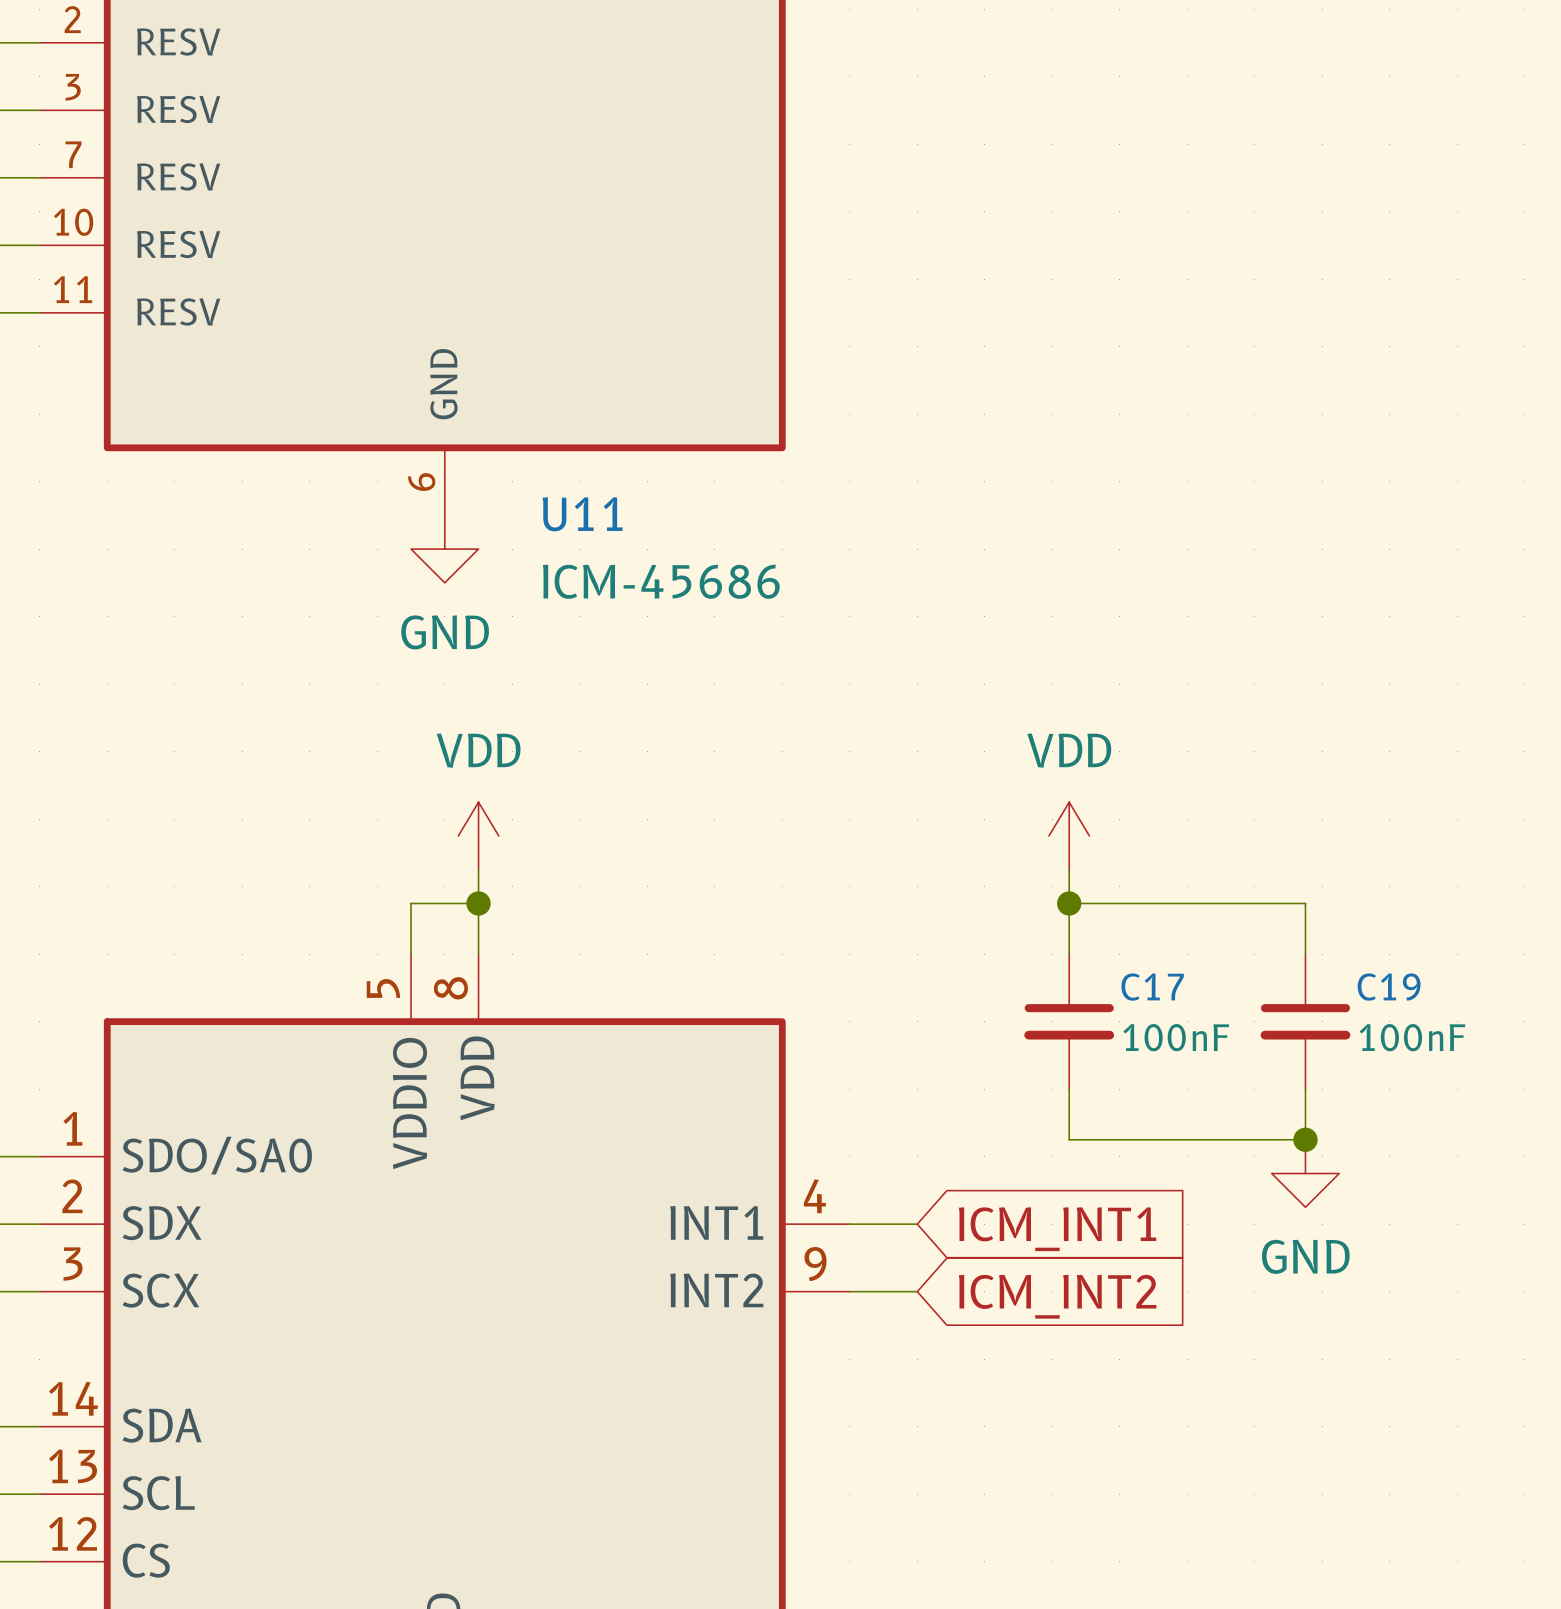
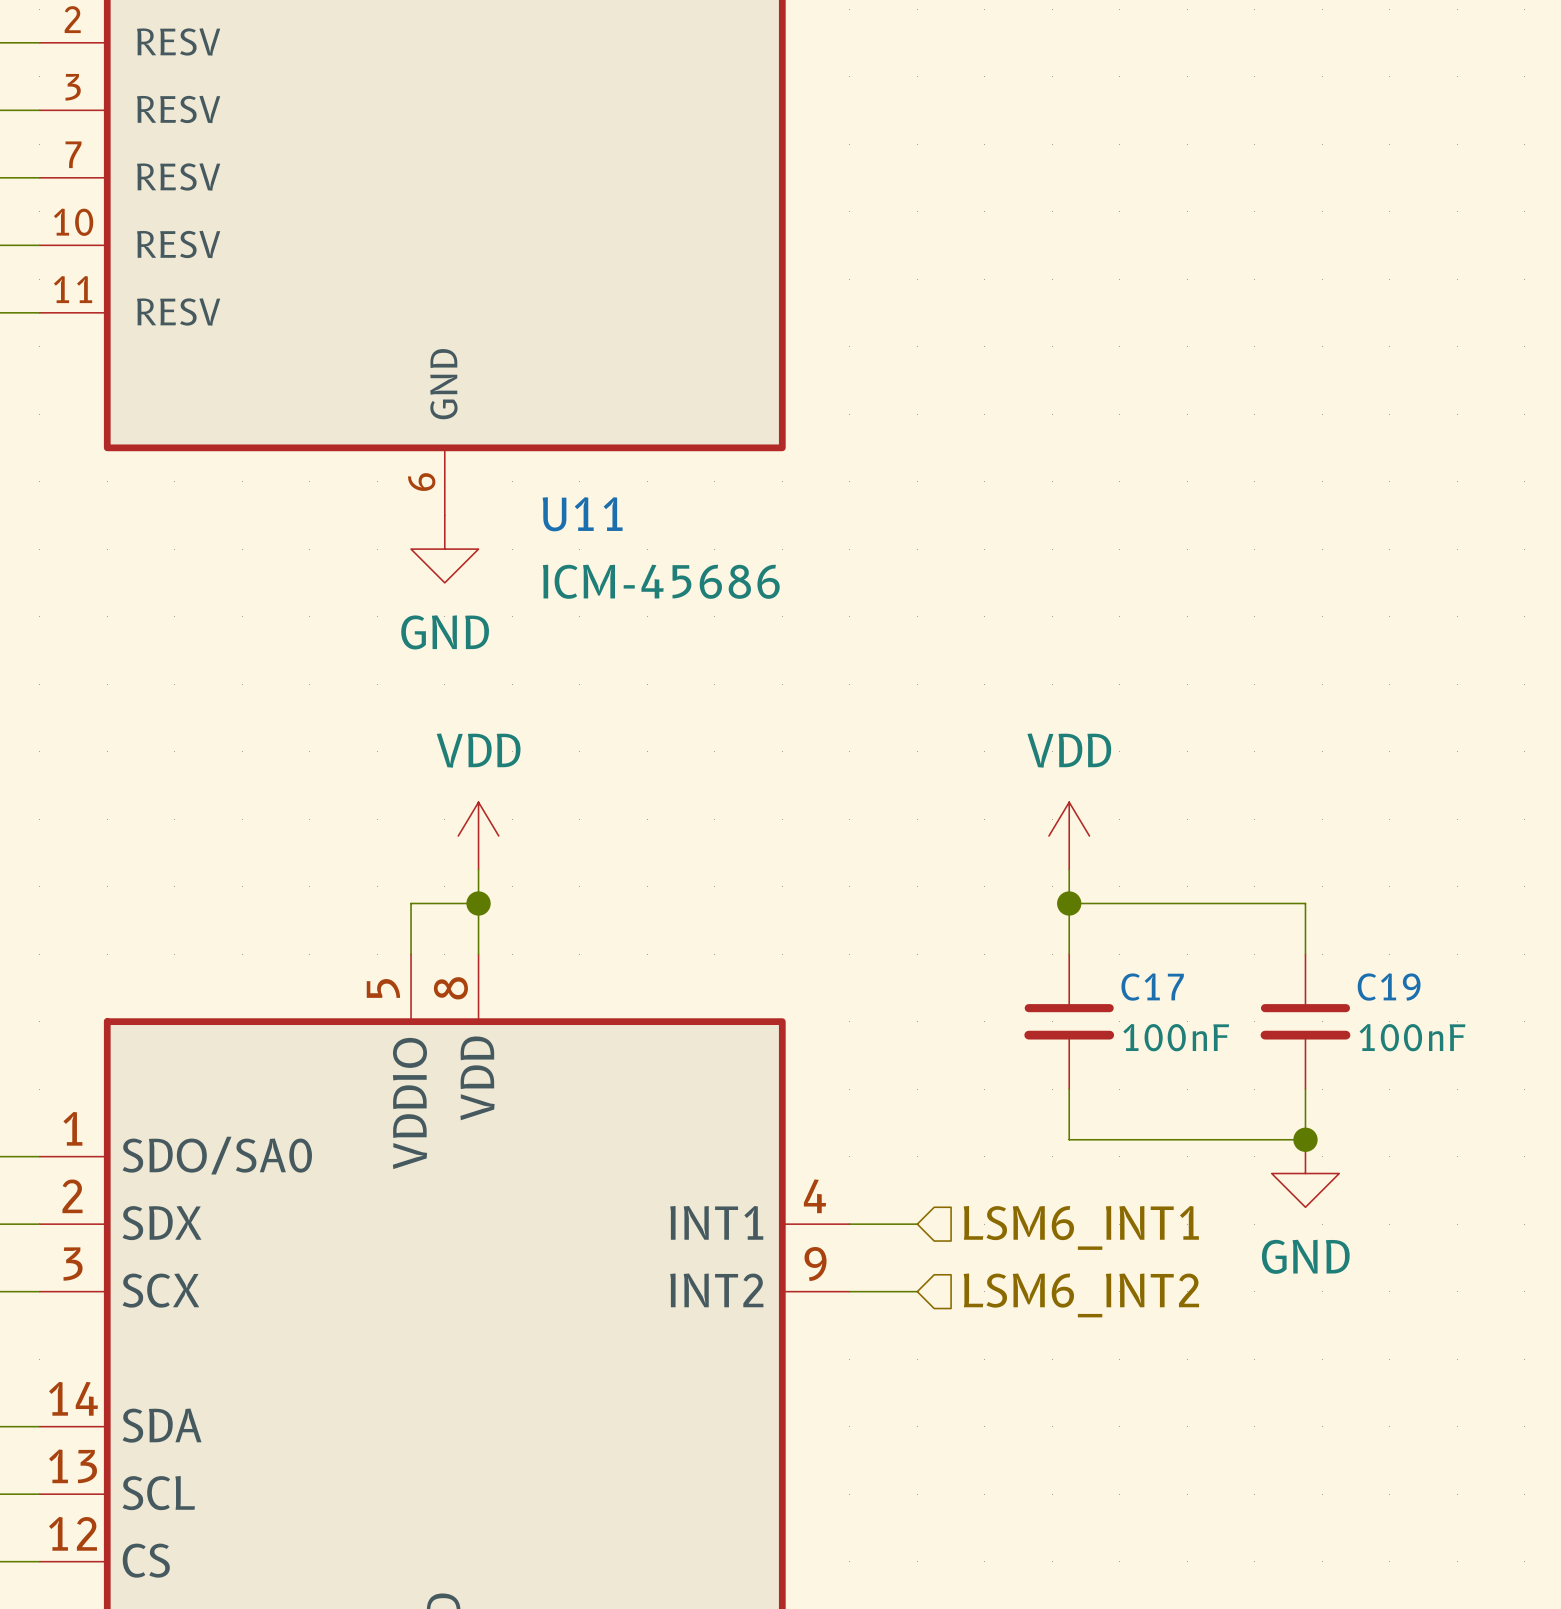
hierarchical label: none -> LSM6_INT1 (1081, 1227)
global label: ICM_INT1 (1057, 1229) -> none
hierarchical label: none -> LSM6_INT2 (1081, 1295)
global label: ICM_INT2 (1057, 1296) -> none

